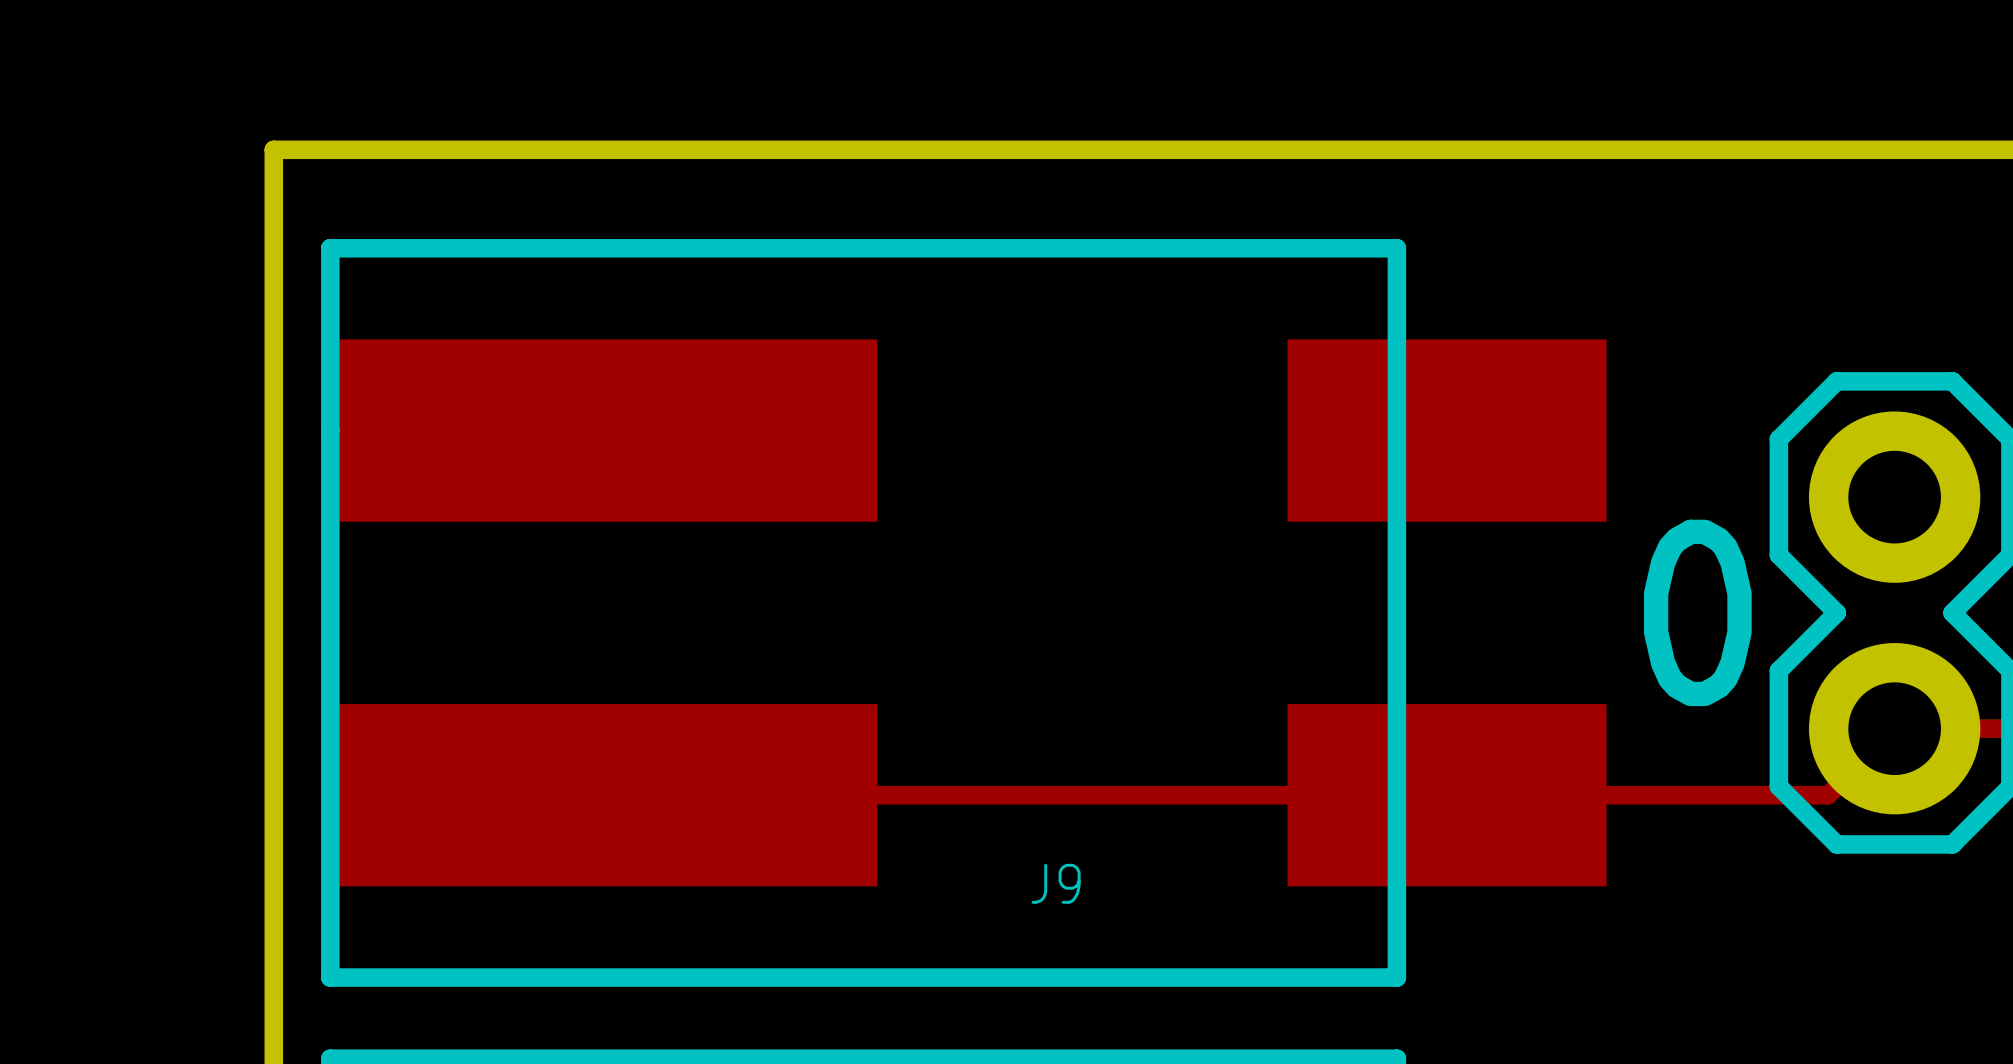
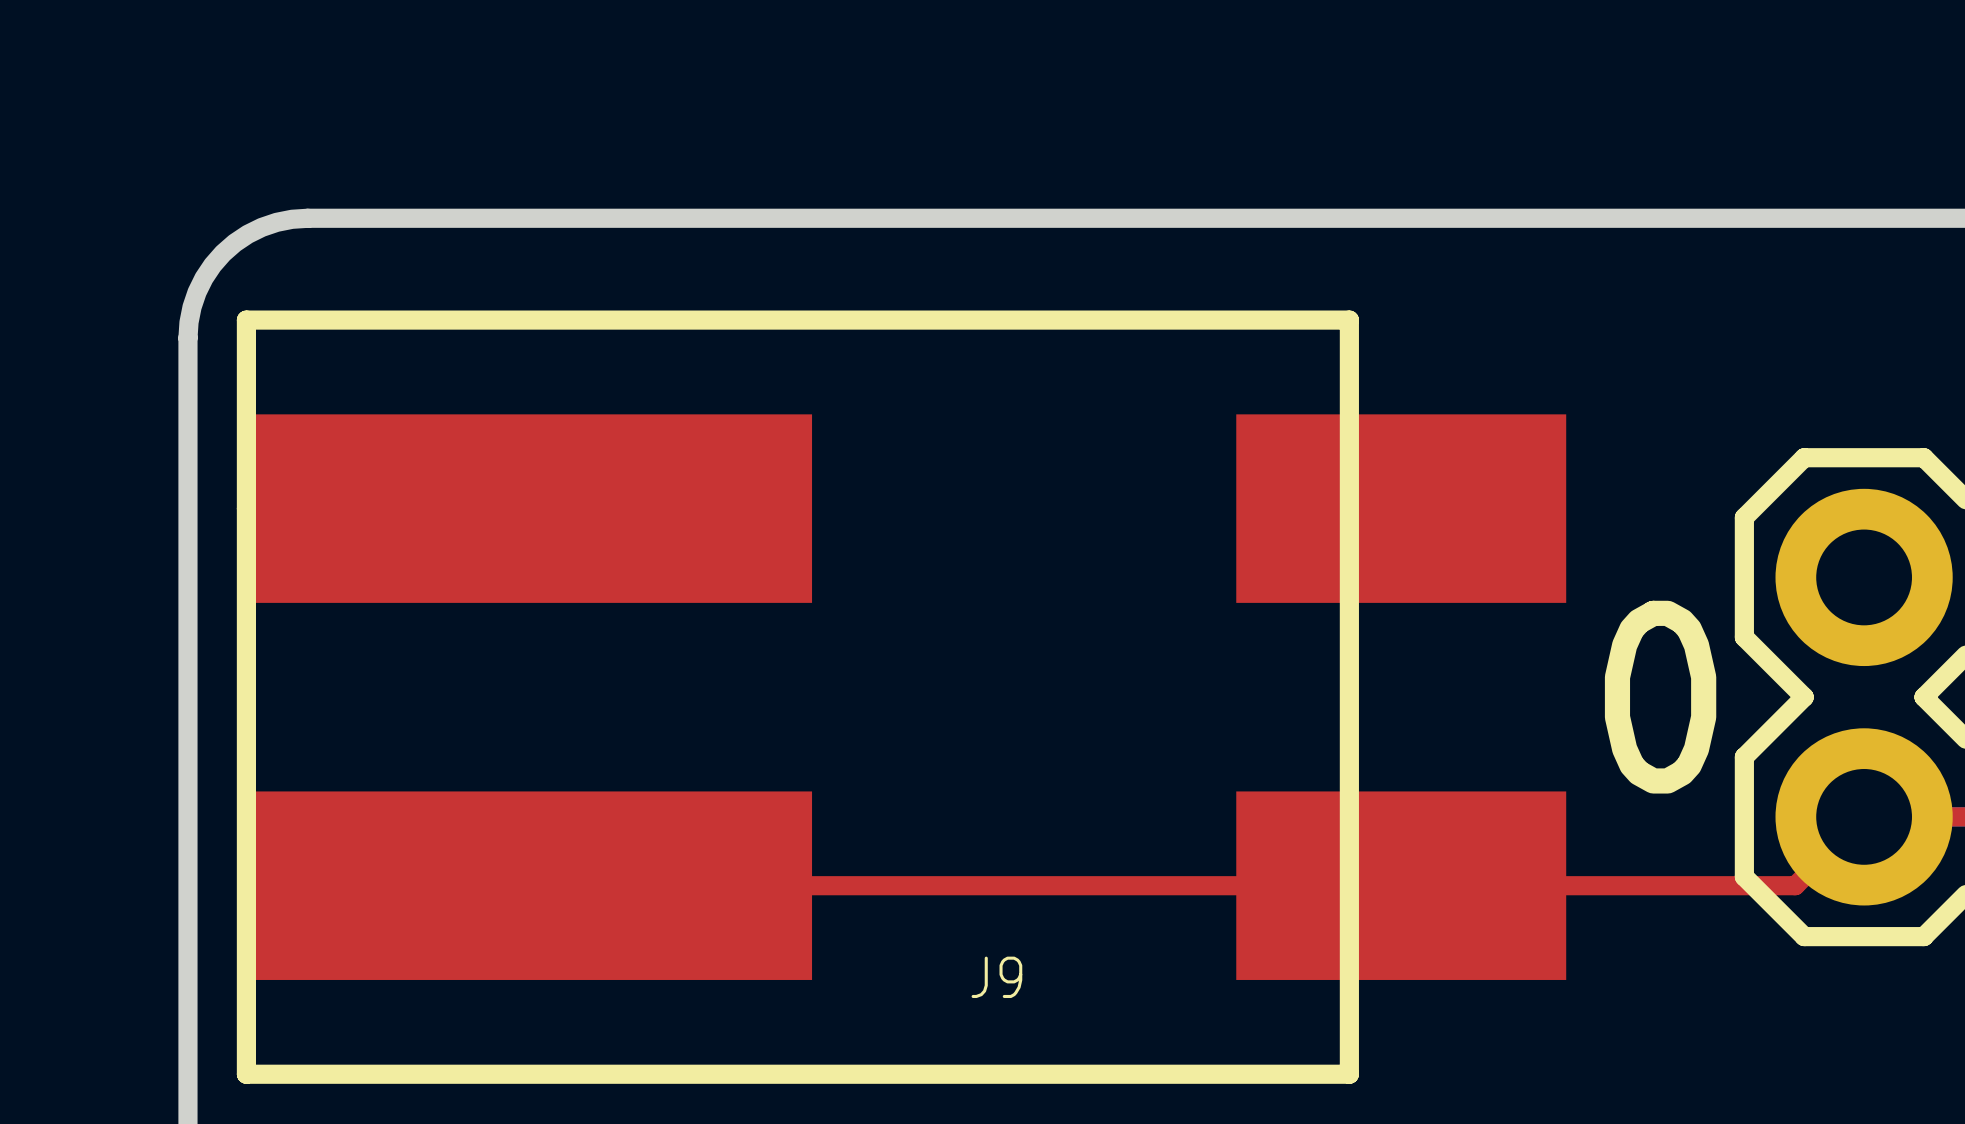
board edge: (389, 149) (273, 149) (273, 265) -> (307, 218) (276, 222) (261, 227) (247, 234) (223, 253) (204, 278) (197, 292) (192, 307) (187, 337)

